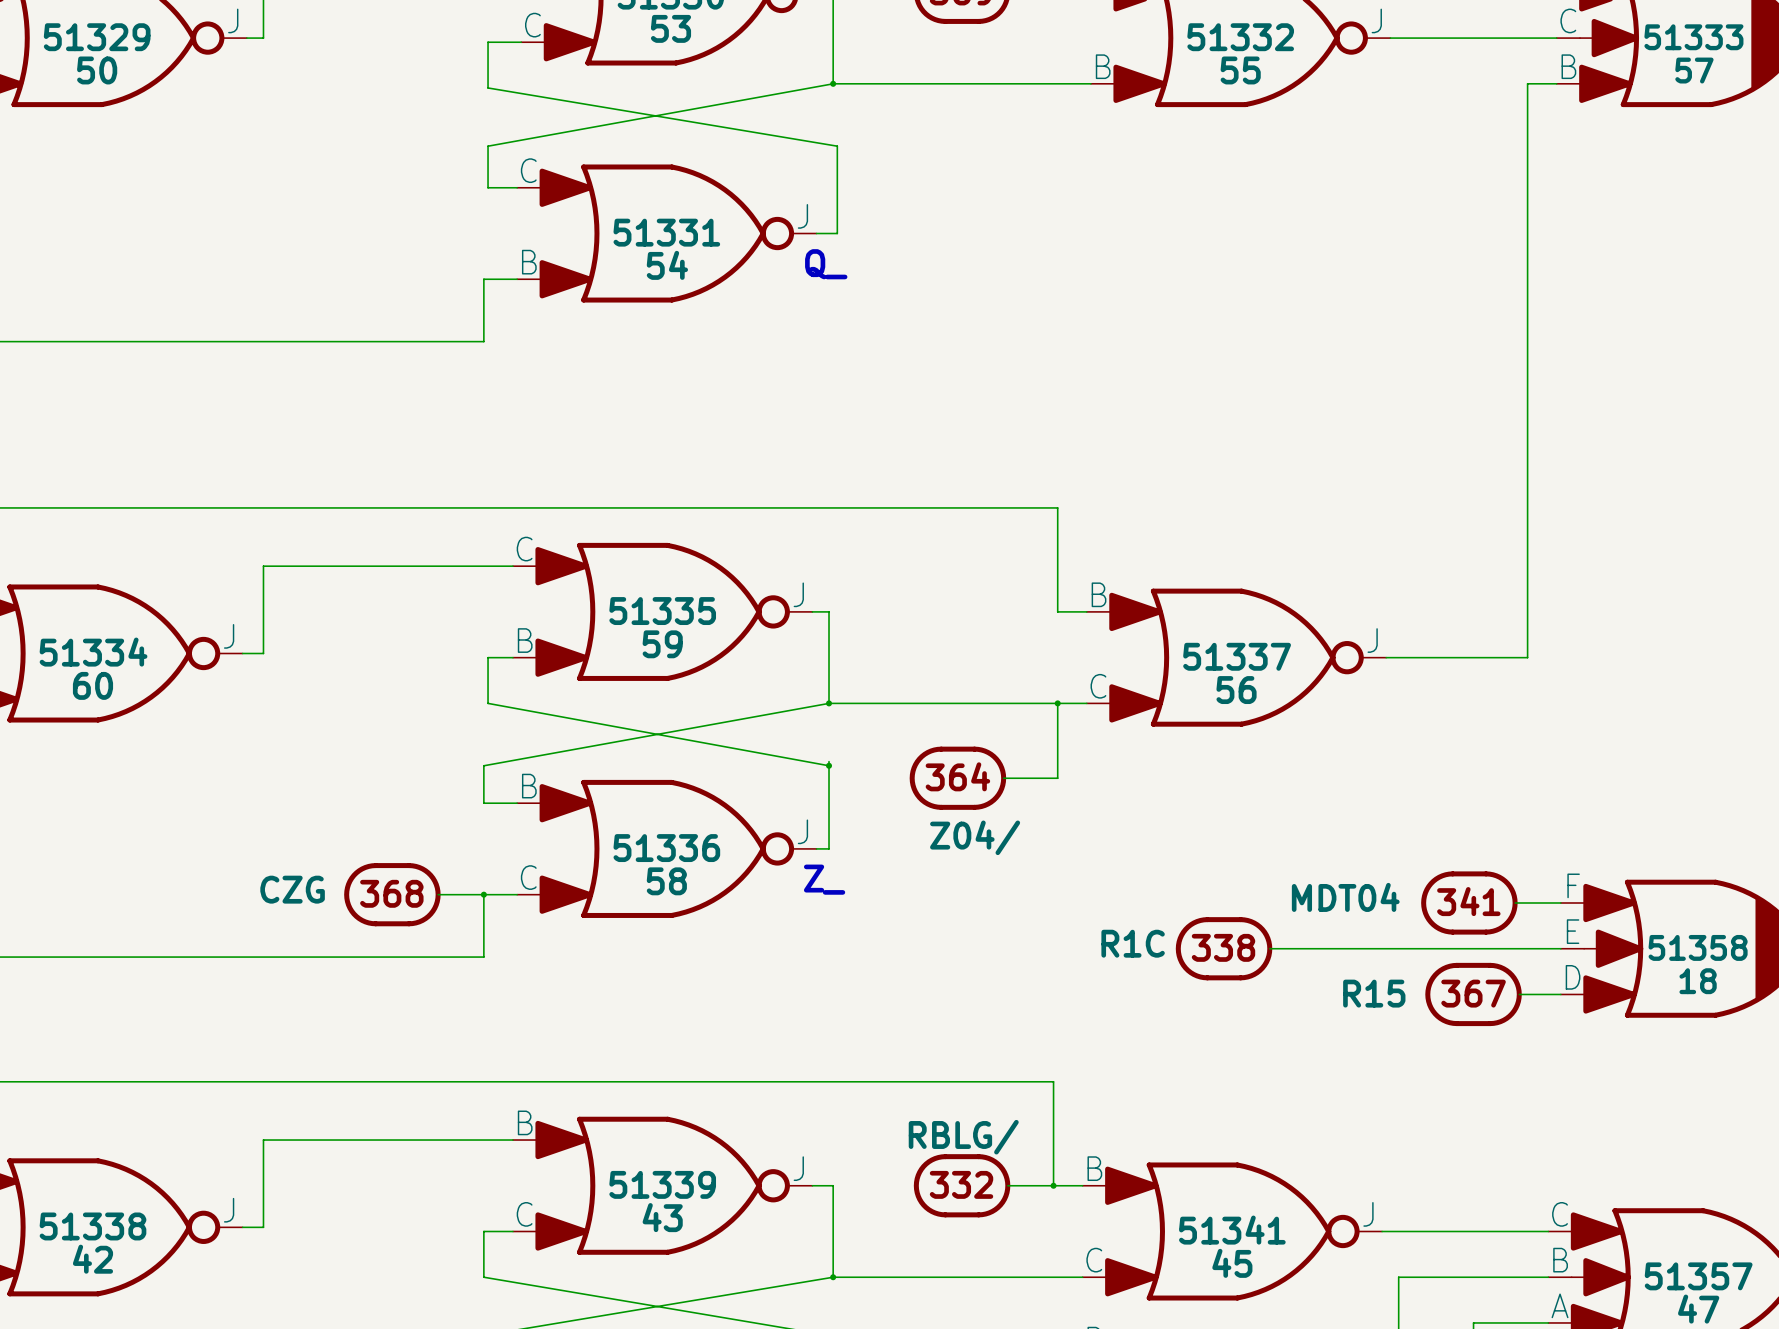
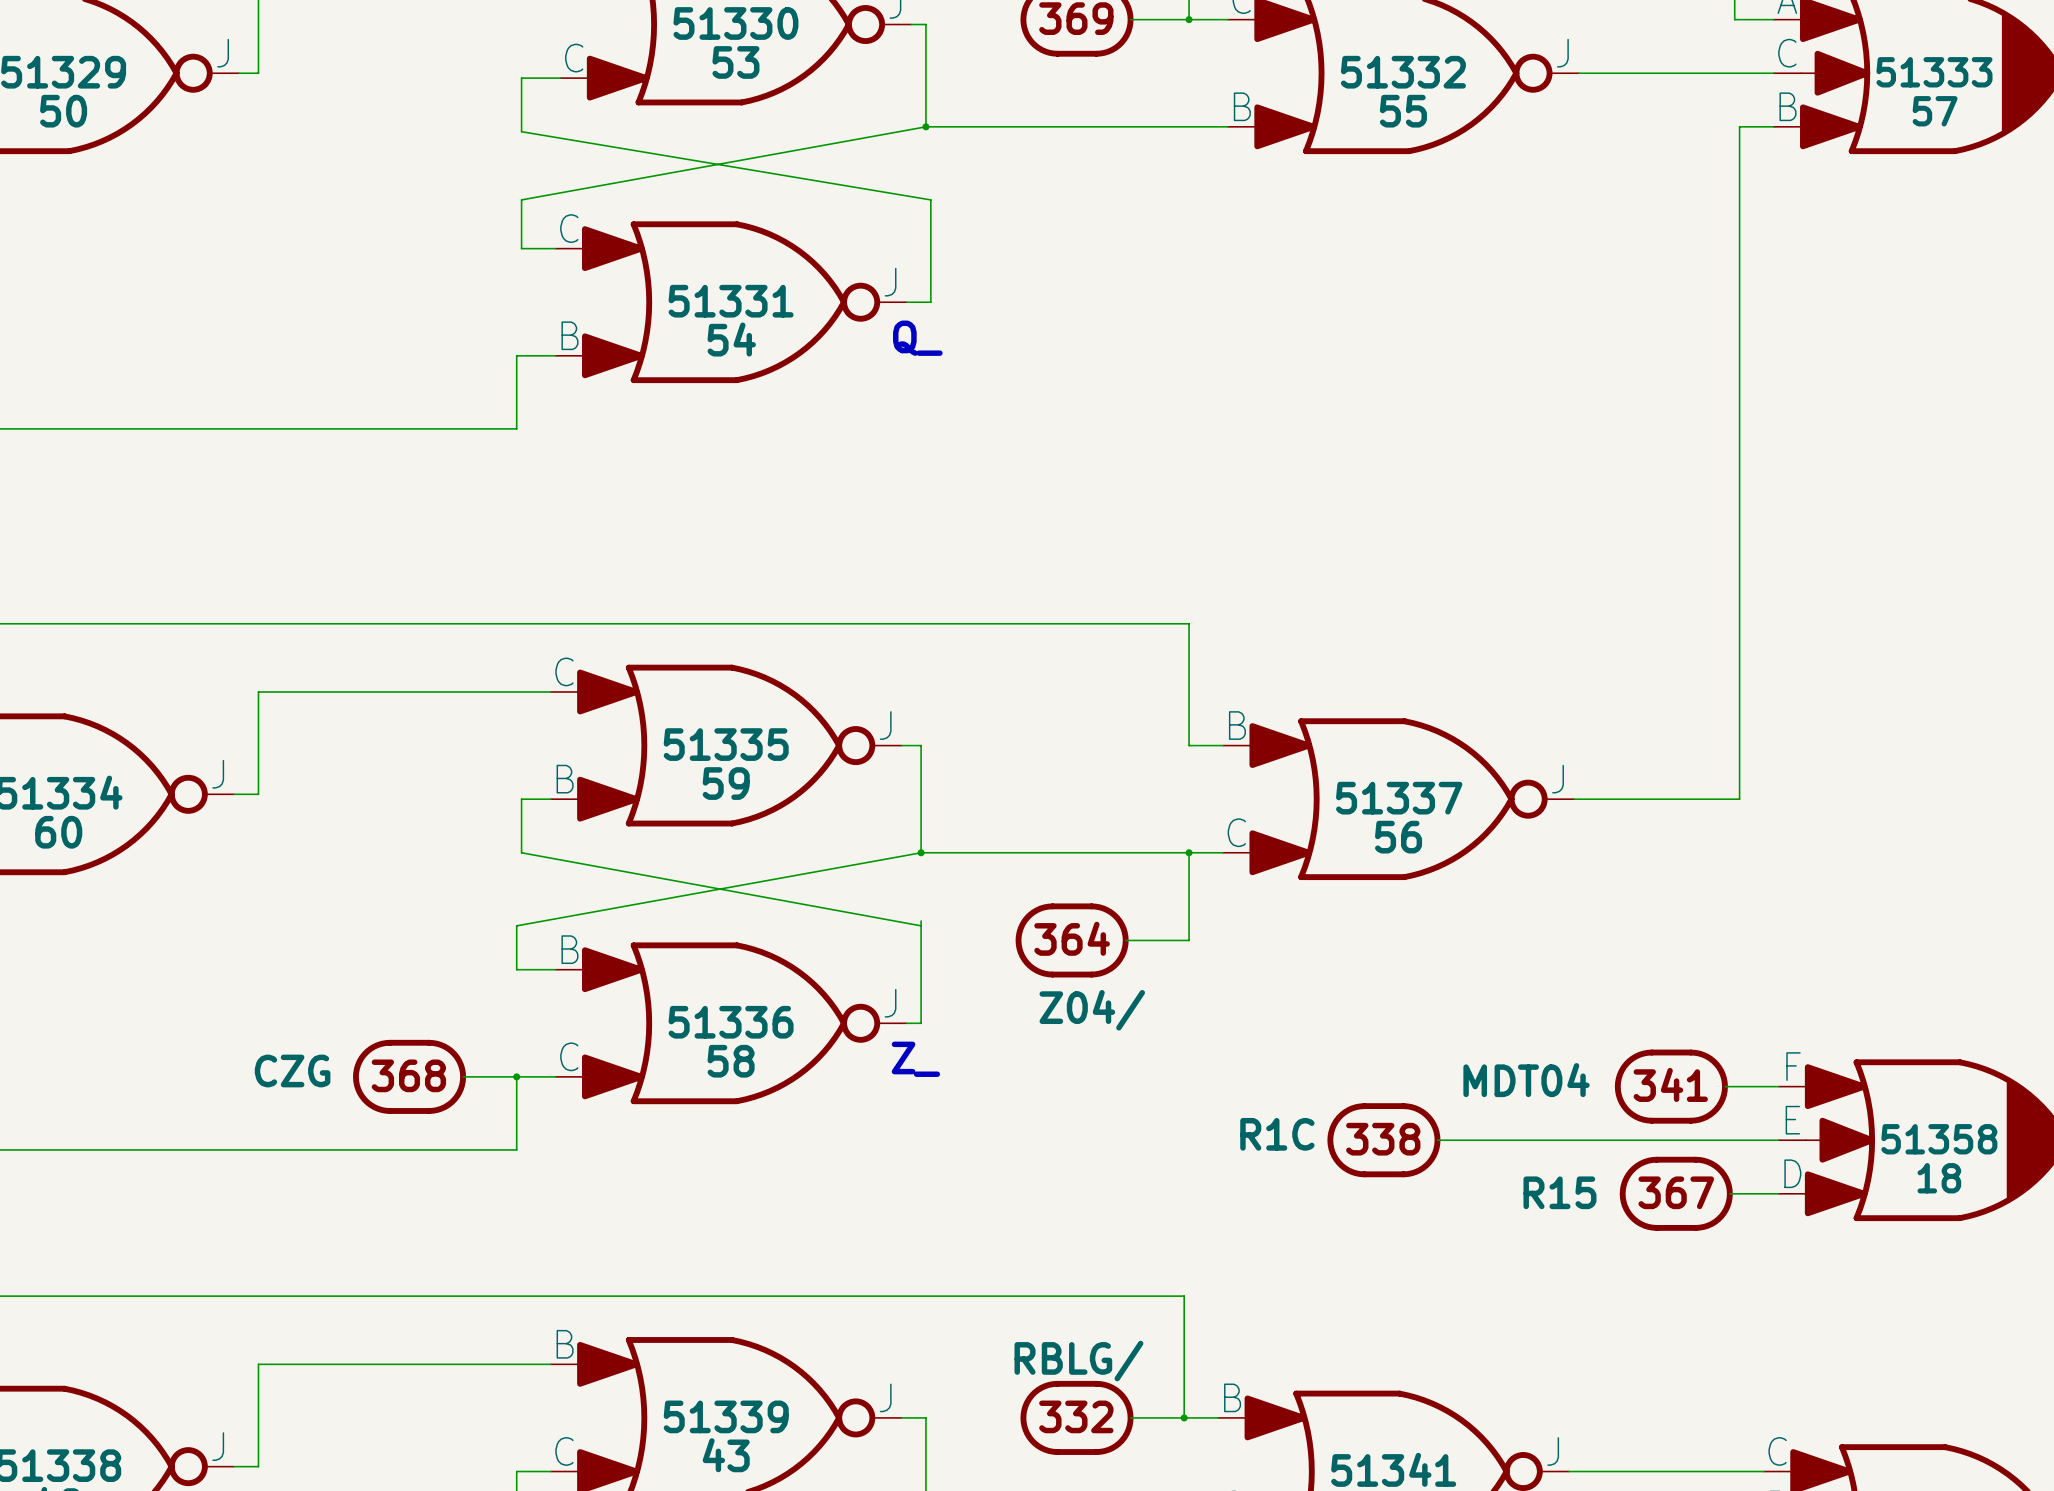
junction: (829, 765) -> none

